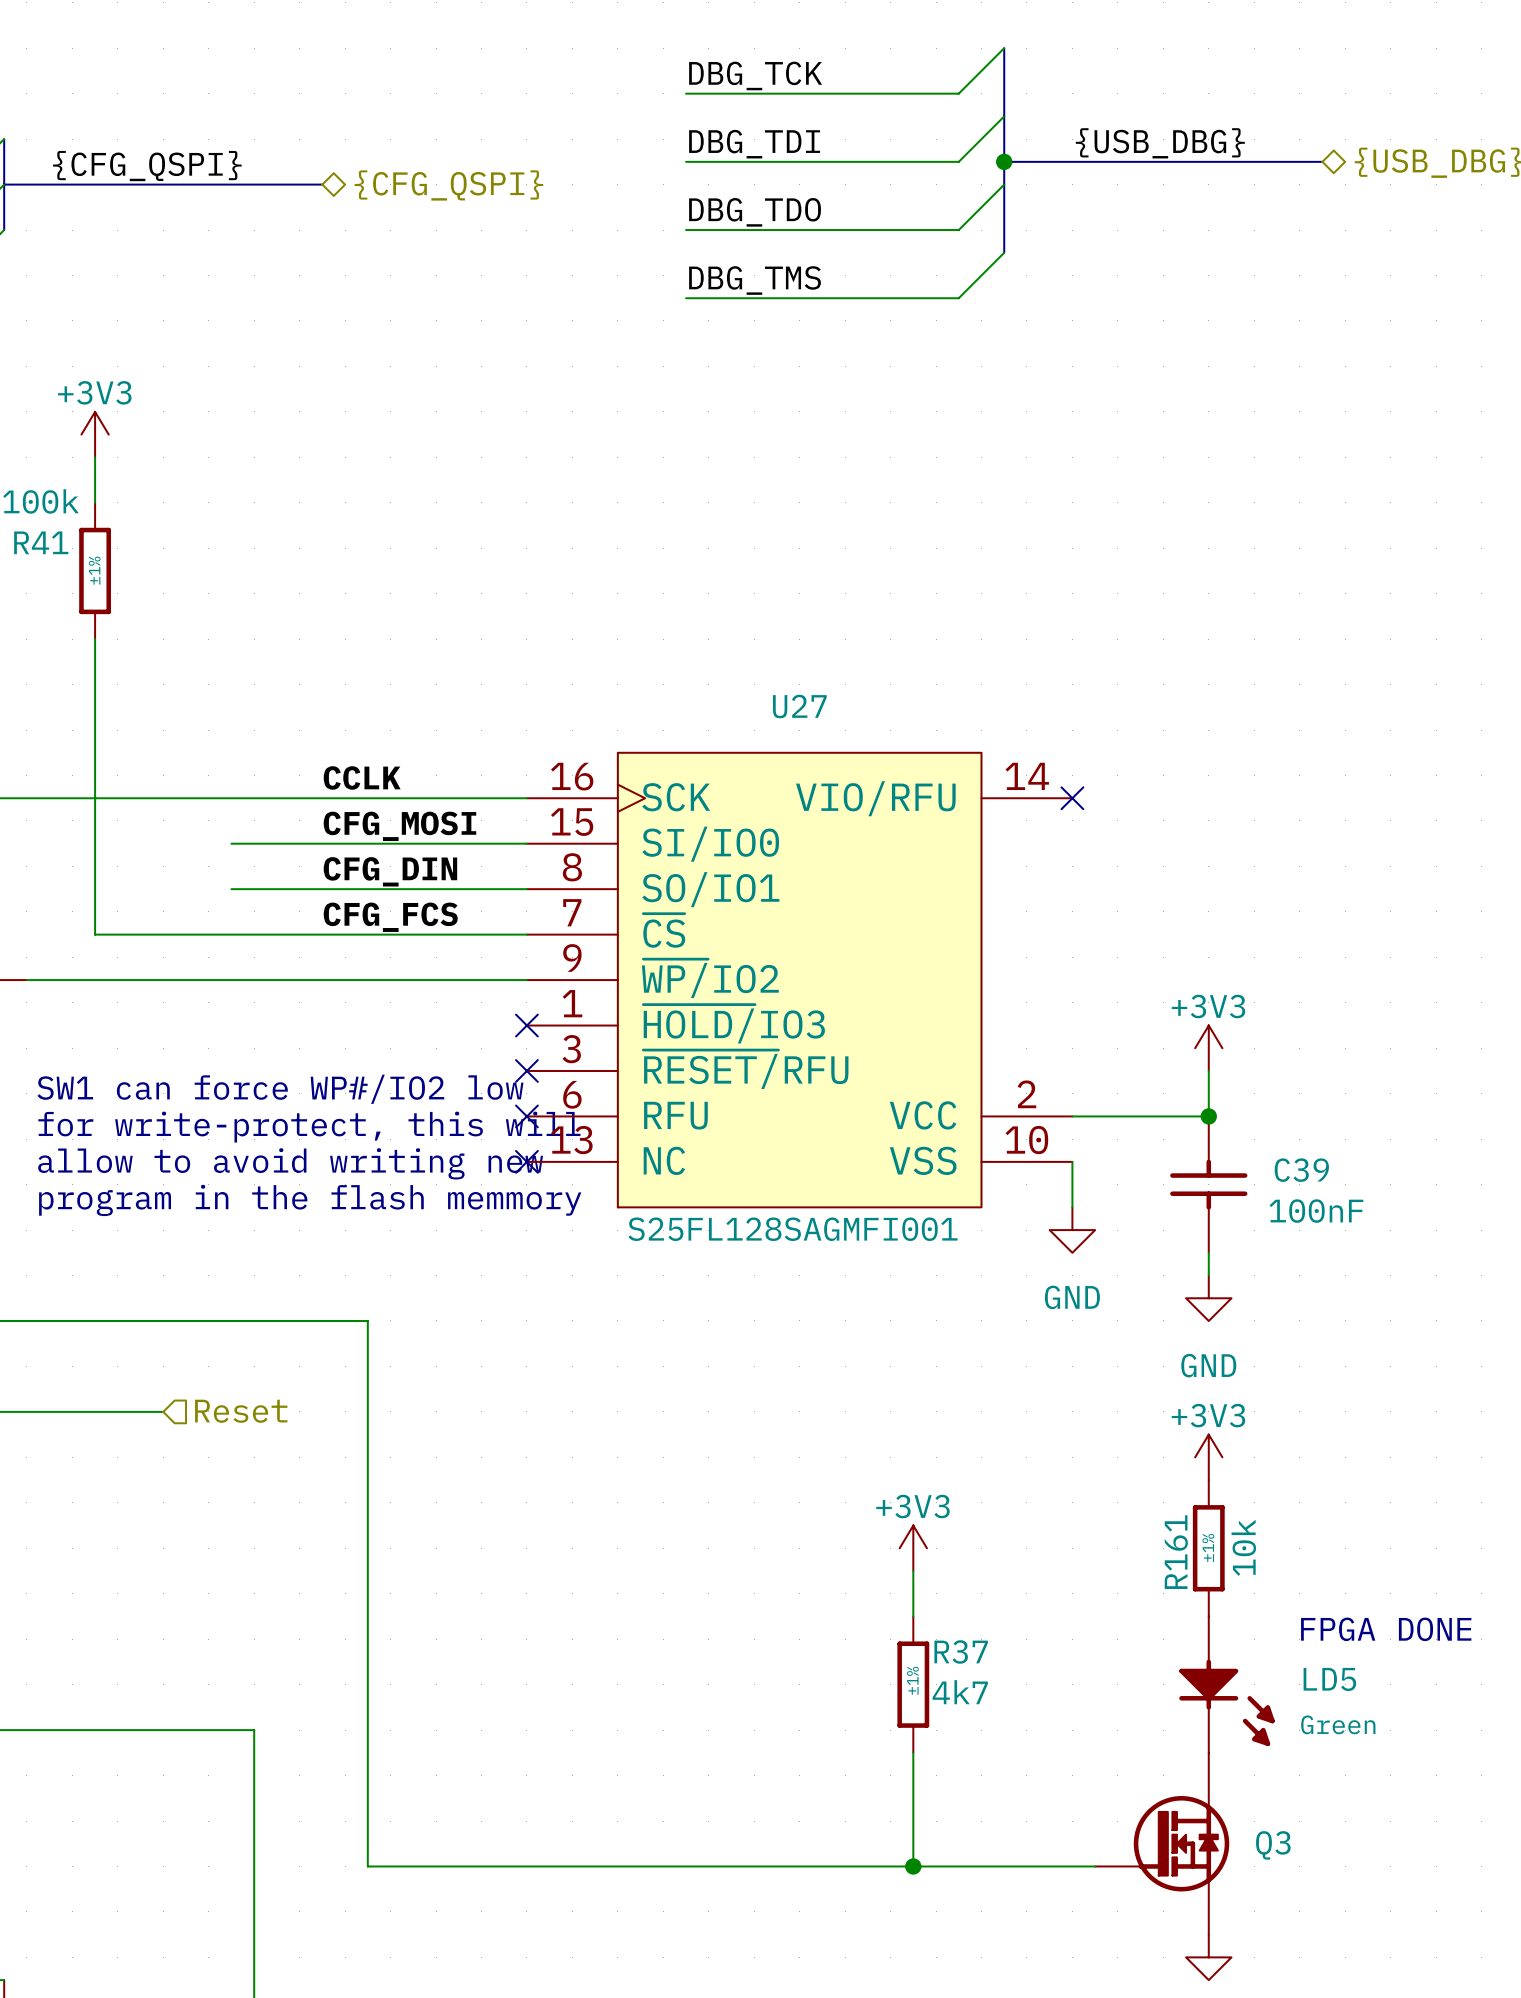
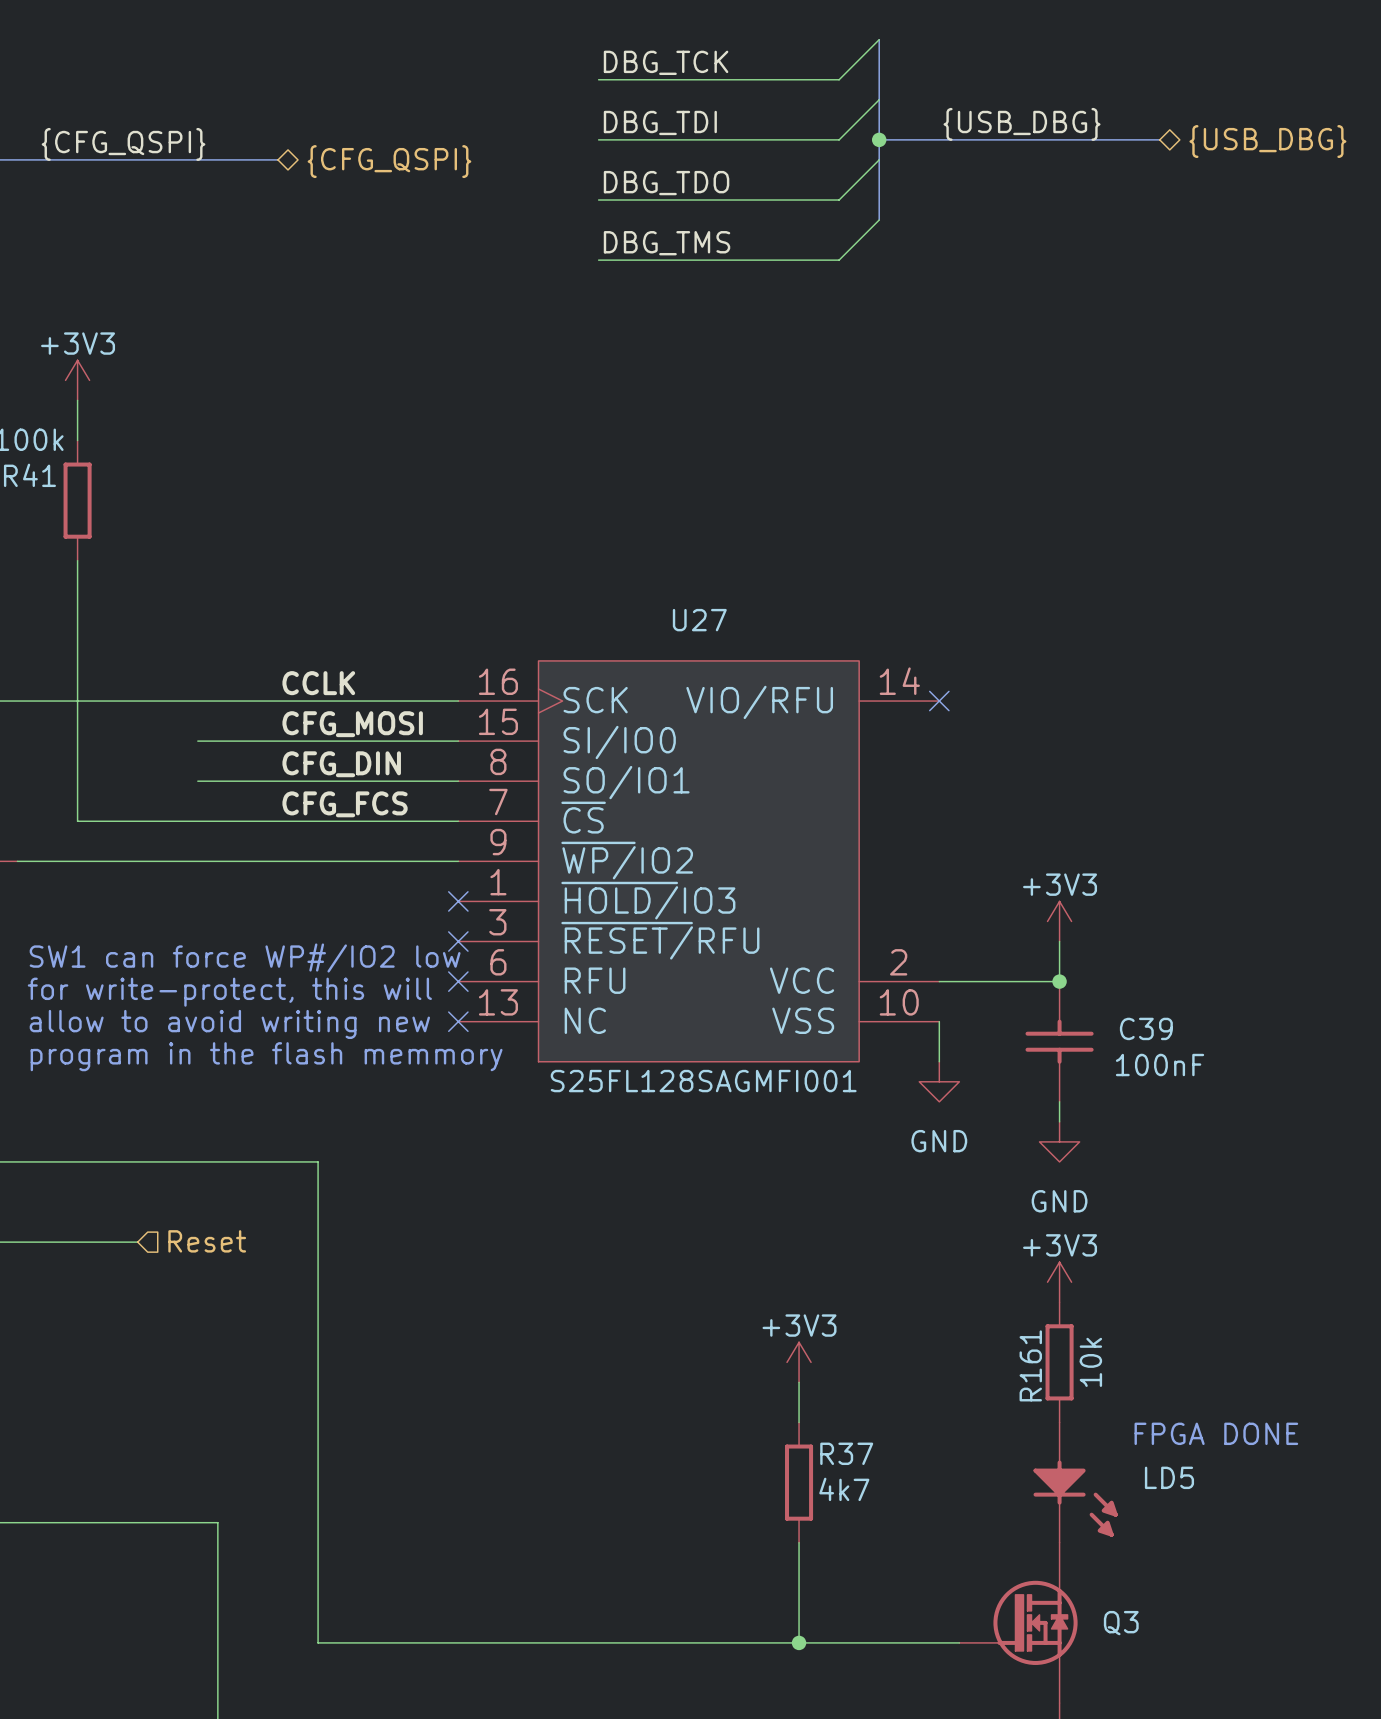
R41 text: ±1% (94, 570) -> none
R161 text: ±1% (1208, 1547) -> none
R37 text: ±1% (912, 1680) -> none
LD5 text: Green (1338, 1724) -> none

